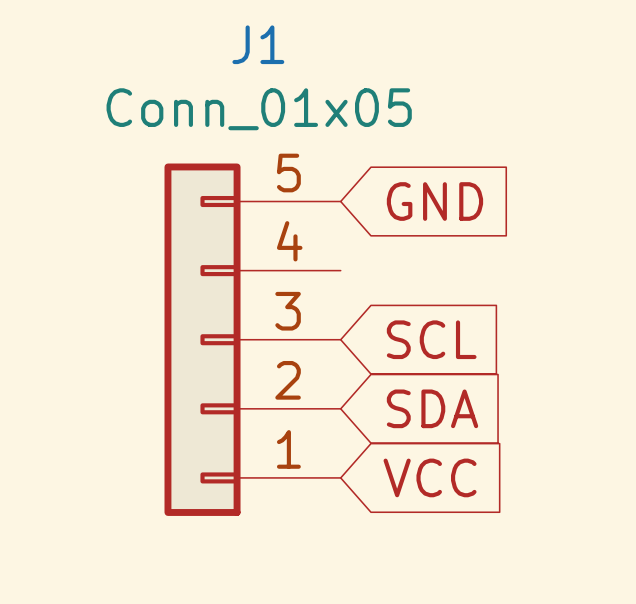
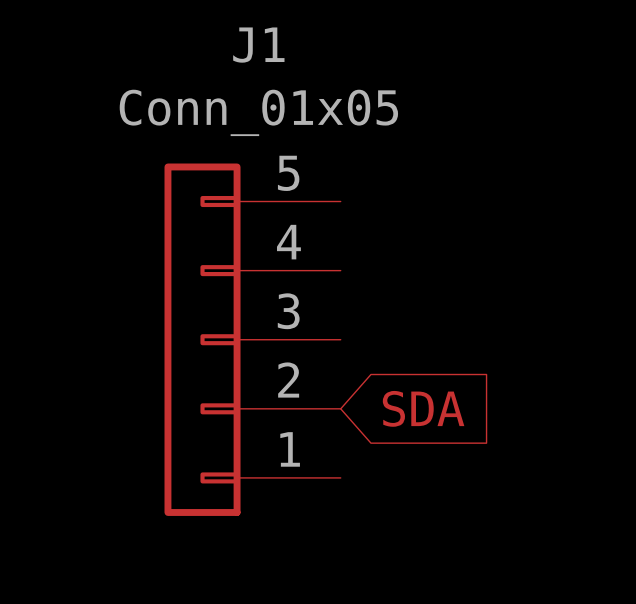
global label: GND (434, 201) -> none
global label: SCL (431, 339) -> none
global label: VCC (430, 477) -> none

